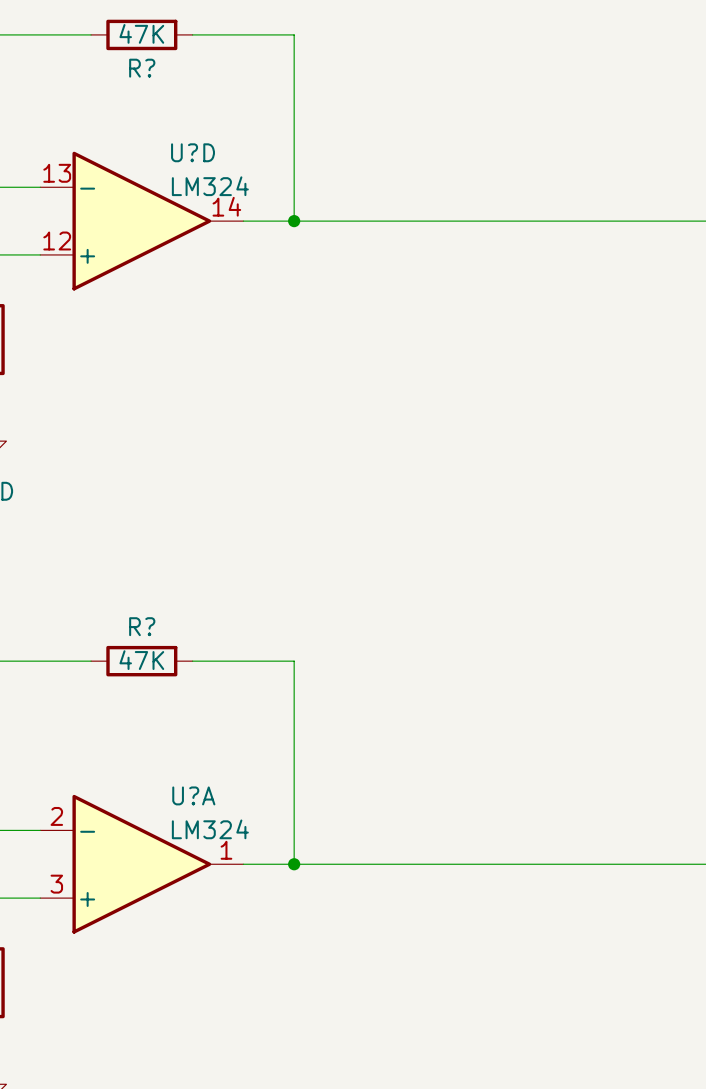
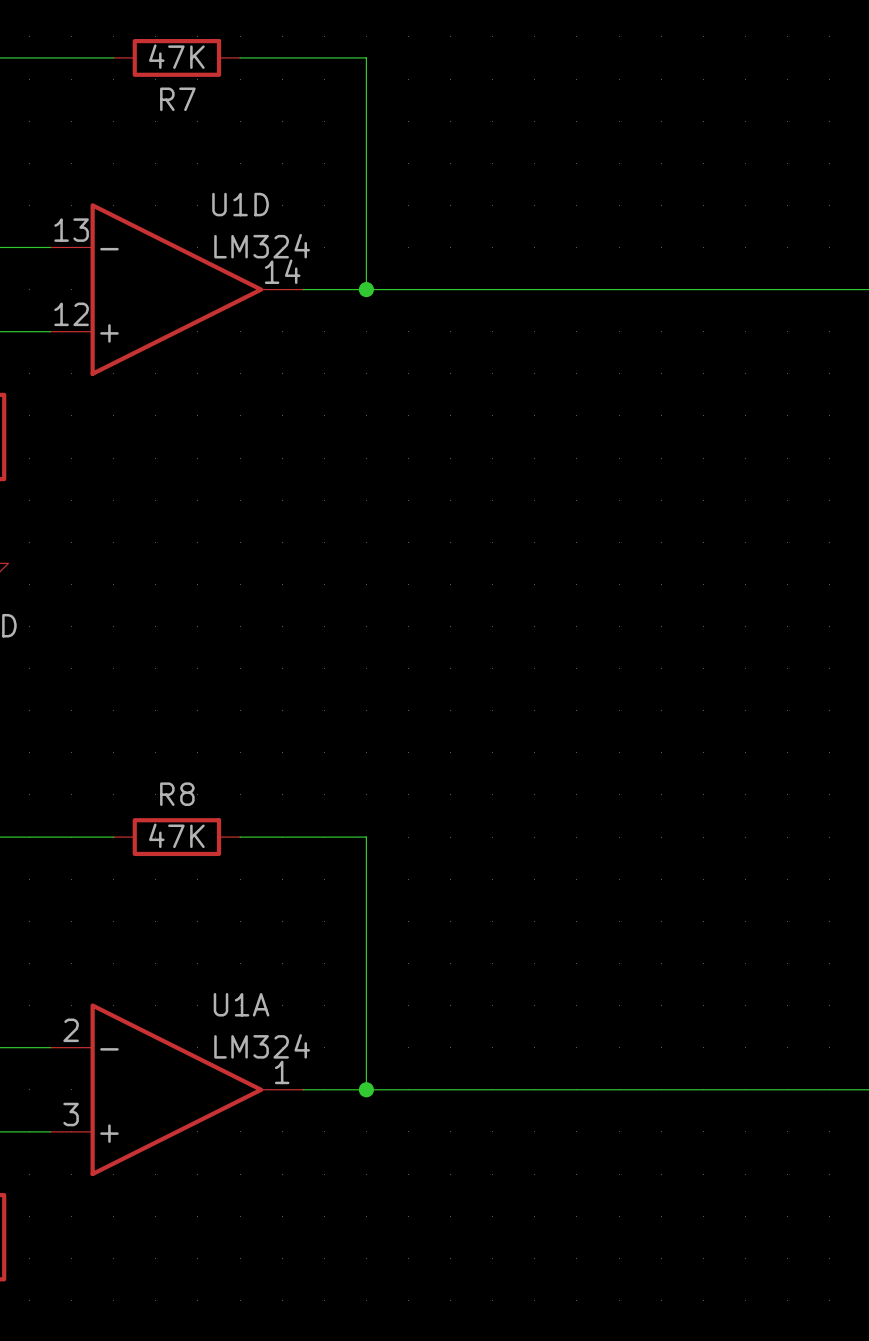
R? name: R? (142, 68) -> R7 (177, 99)
U?D name: U?D (193, 152) -> U1D (240, 204)
R? name: R? (142, 626) -> R8 (177, 794)
U?A name: U?A (193, 795) -> U1A (241, 1004)

